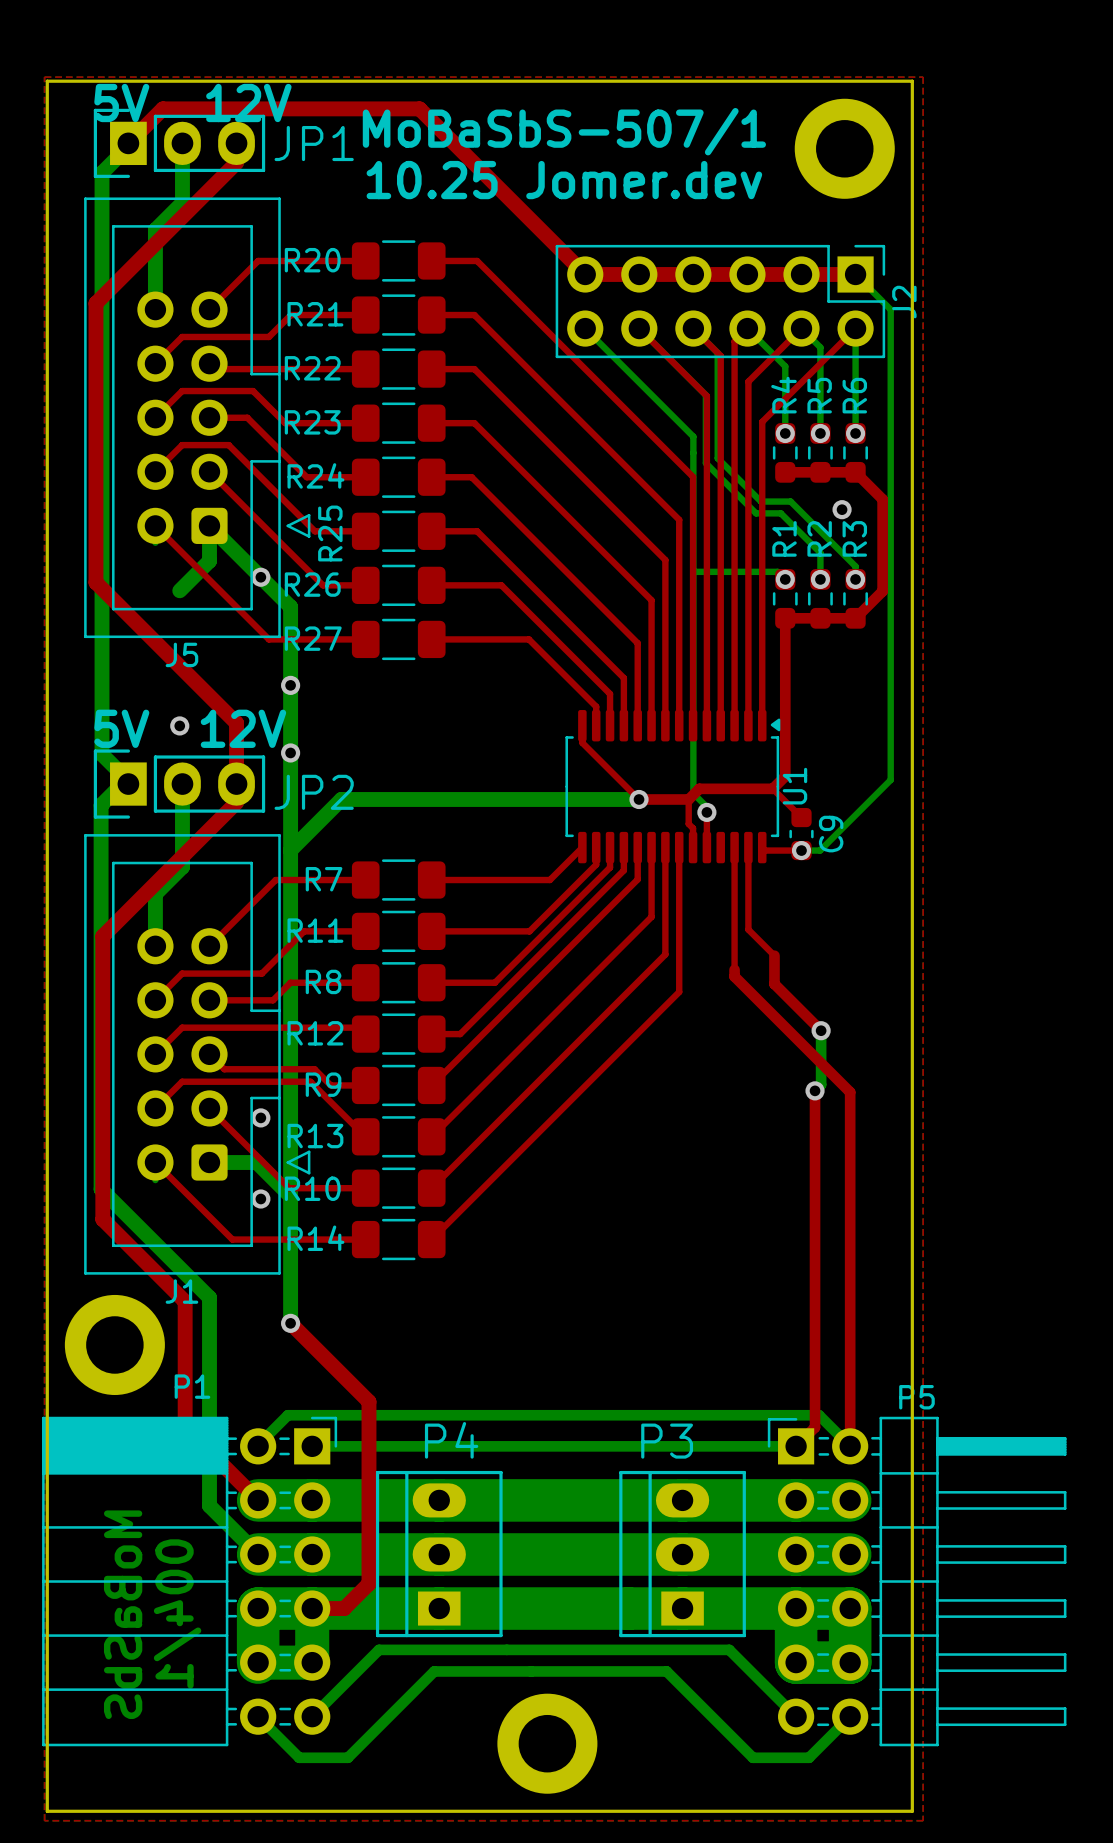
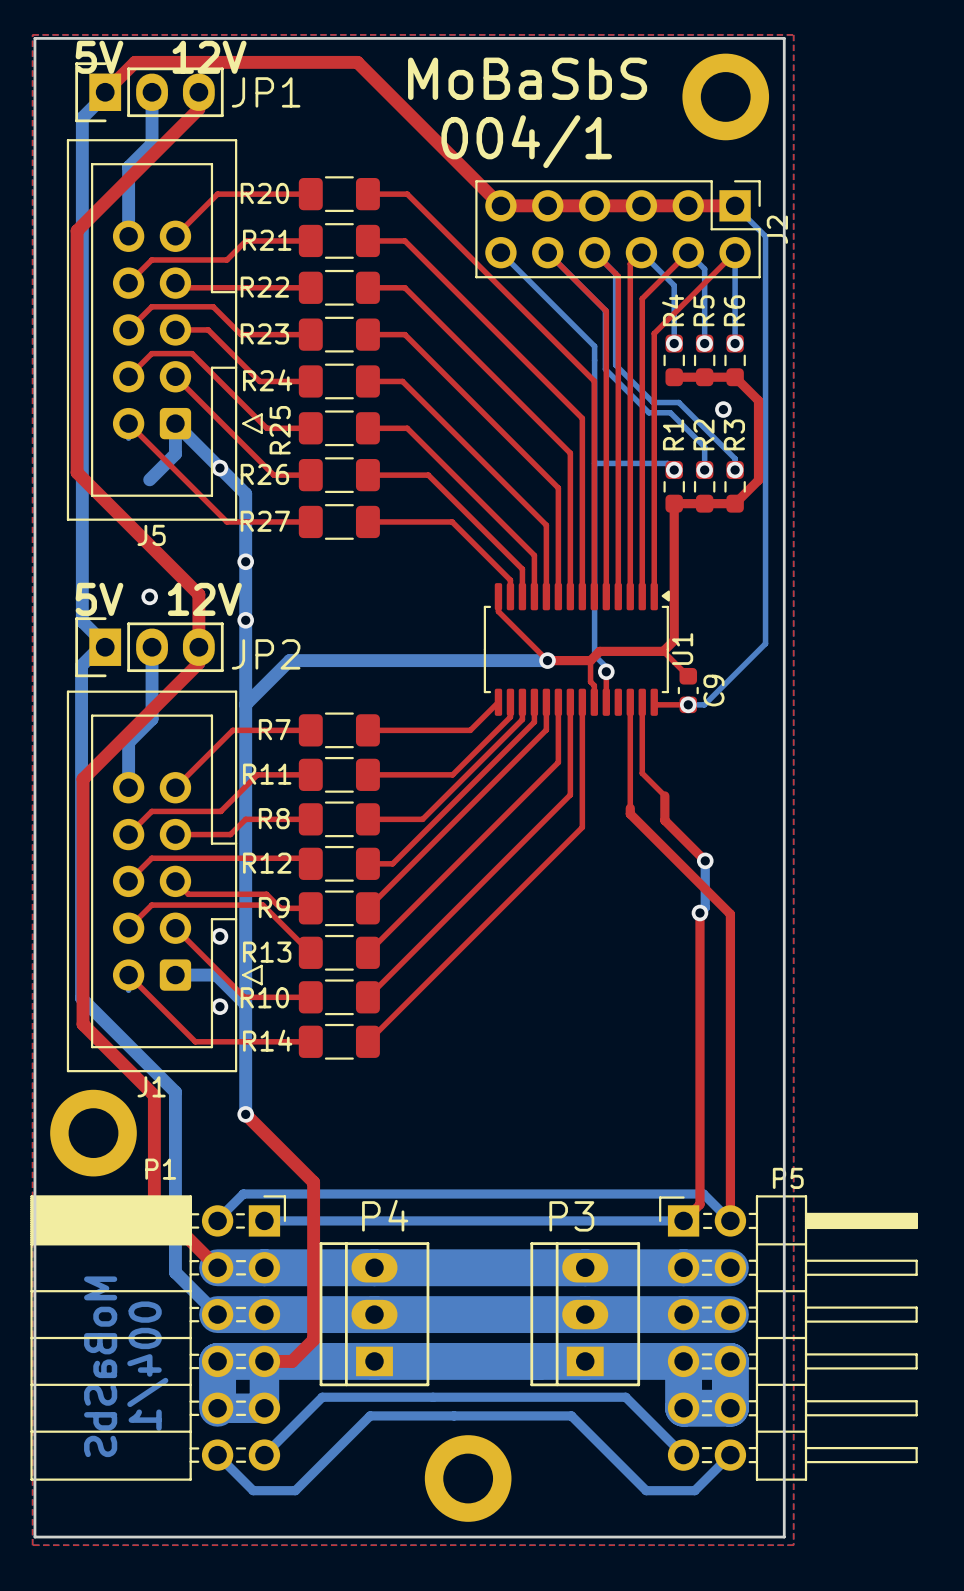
text: MoBaSbS-507/1 (564, 131) -> MoBaSbS (527, 78)
text: 10.25 Jomer.dev (564, 180) -> none
text: none -> 004/1 (526, 141)

